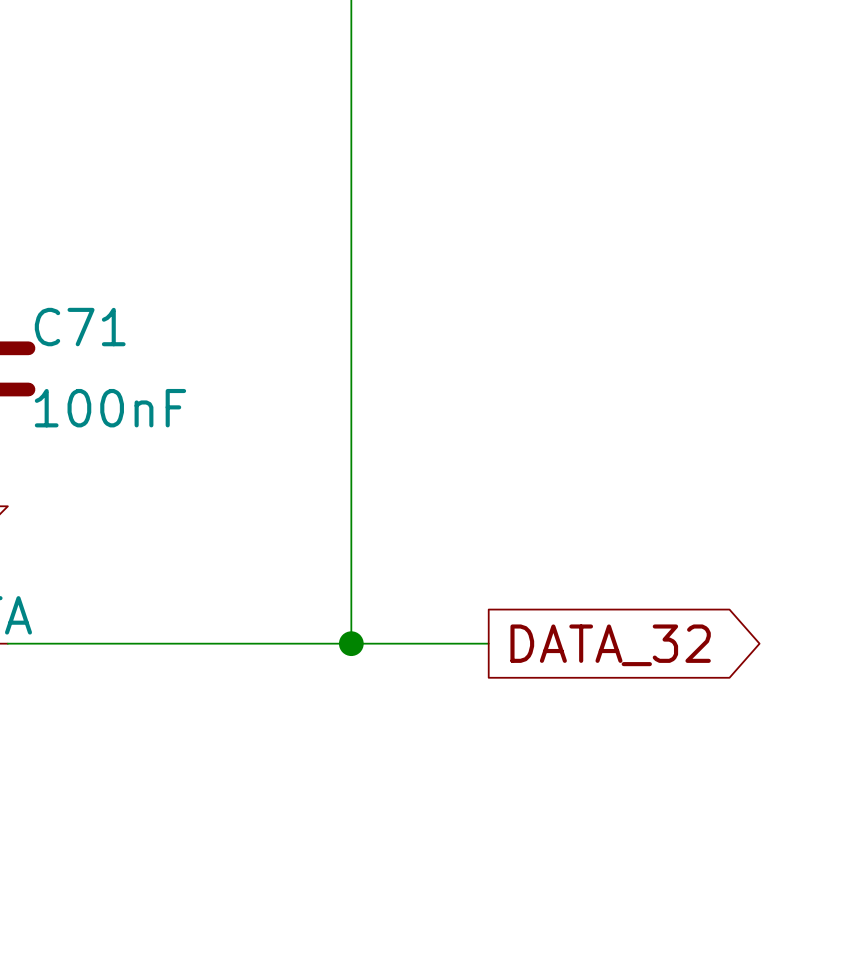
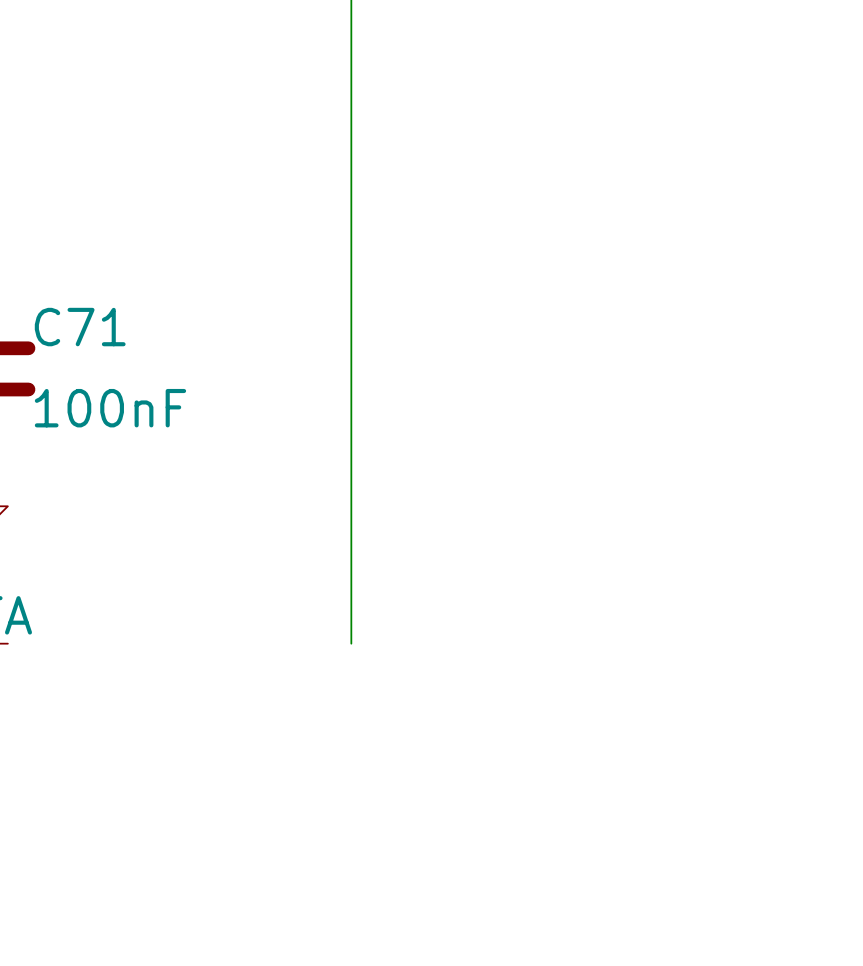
wire: (7, 643) (488, 643) -> none
junction: (351, 643) -> none
global label: DATA_32 (610, 645) -> none

